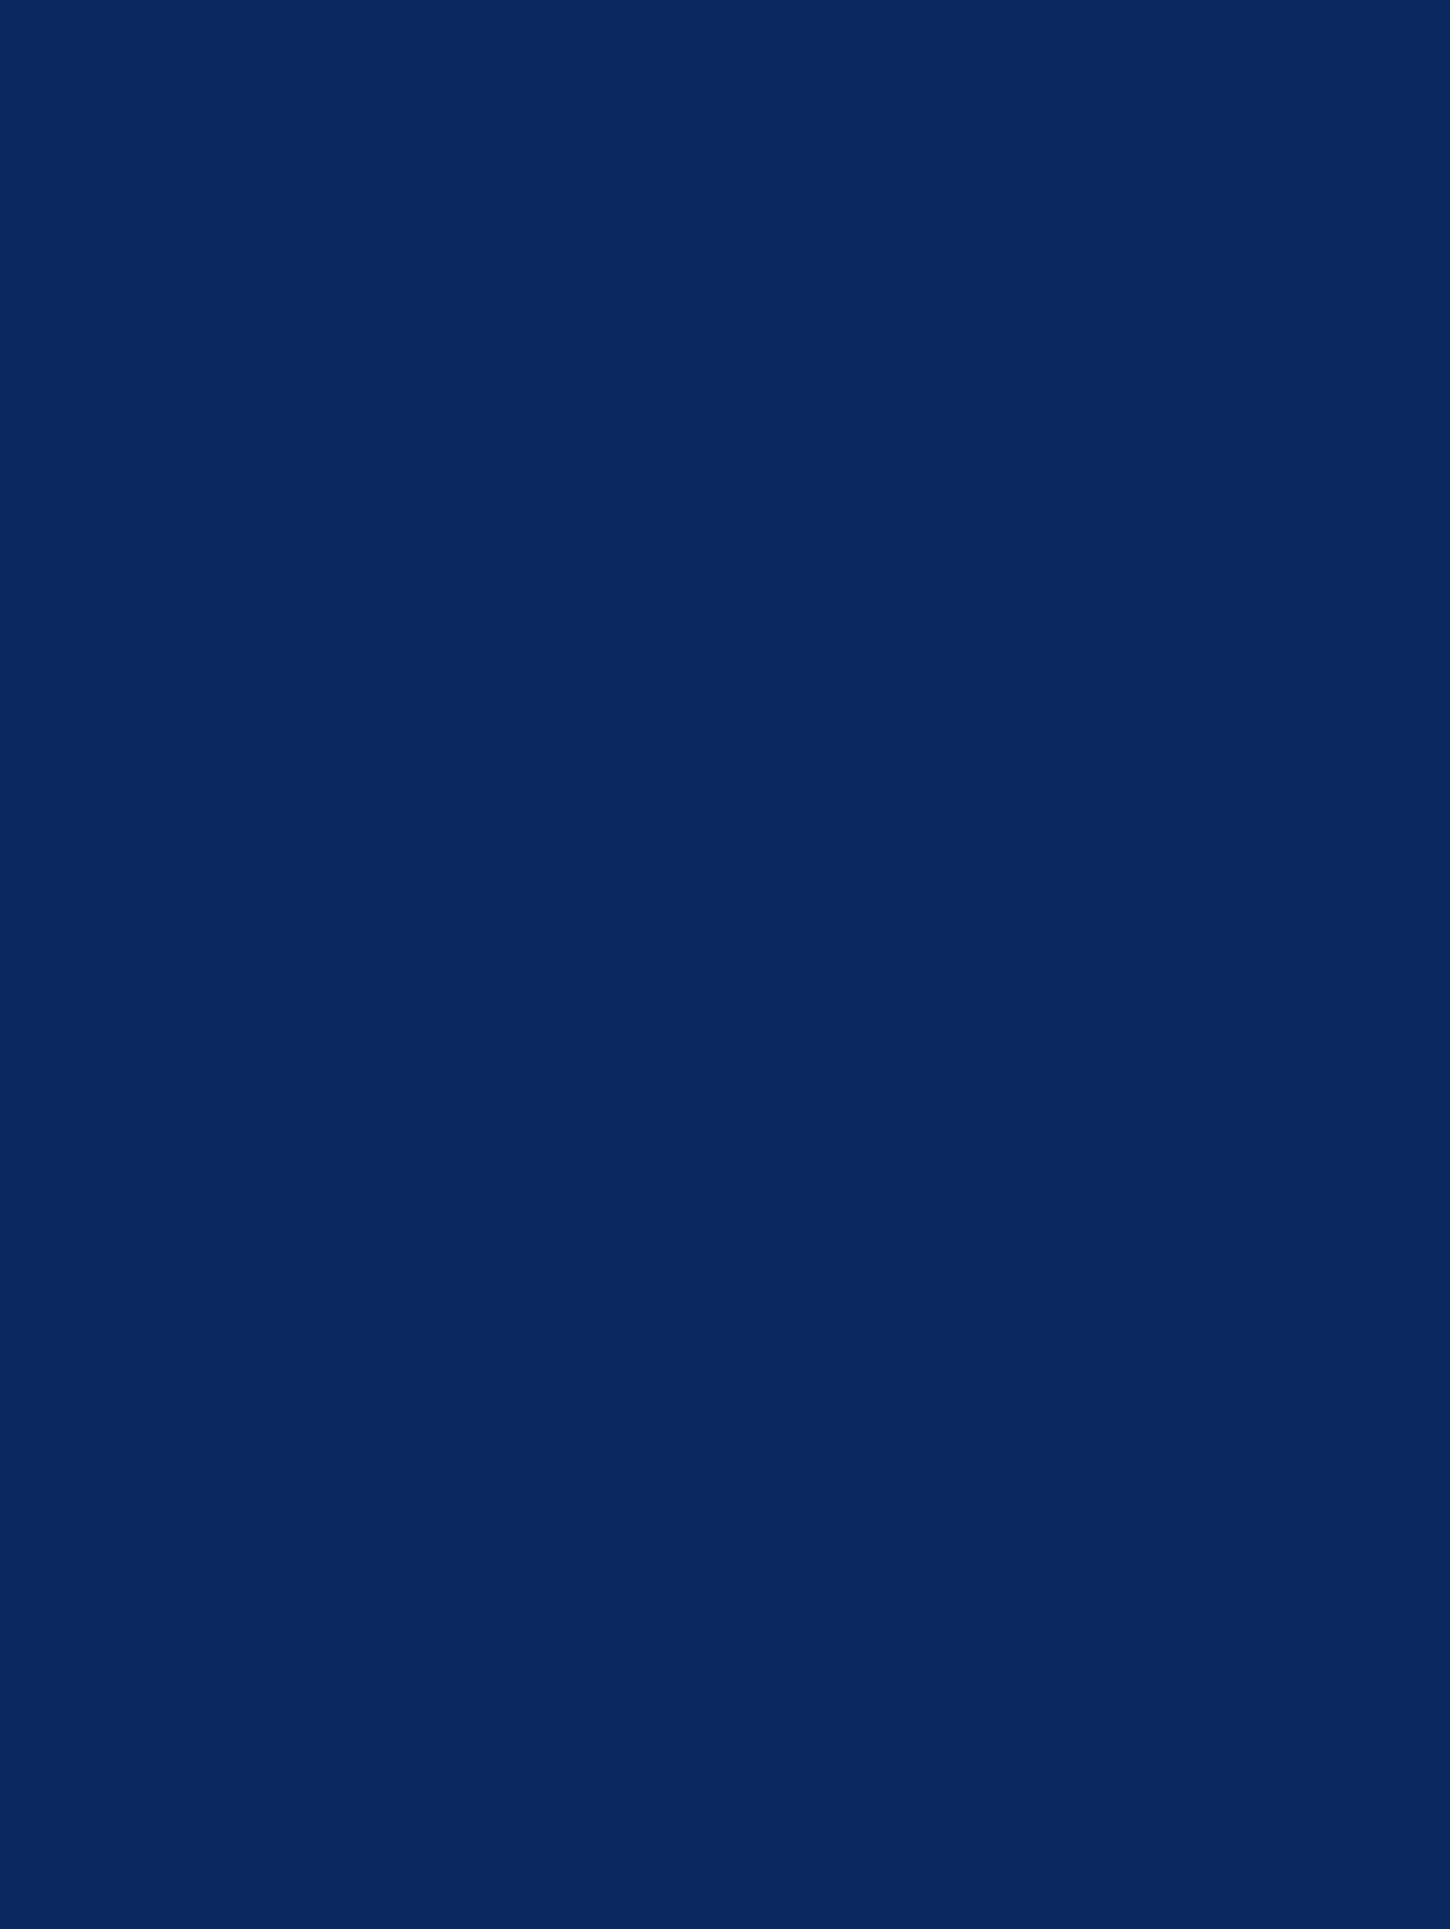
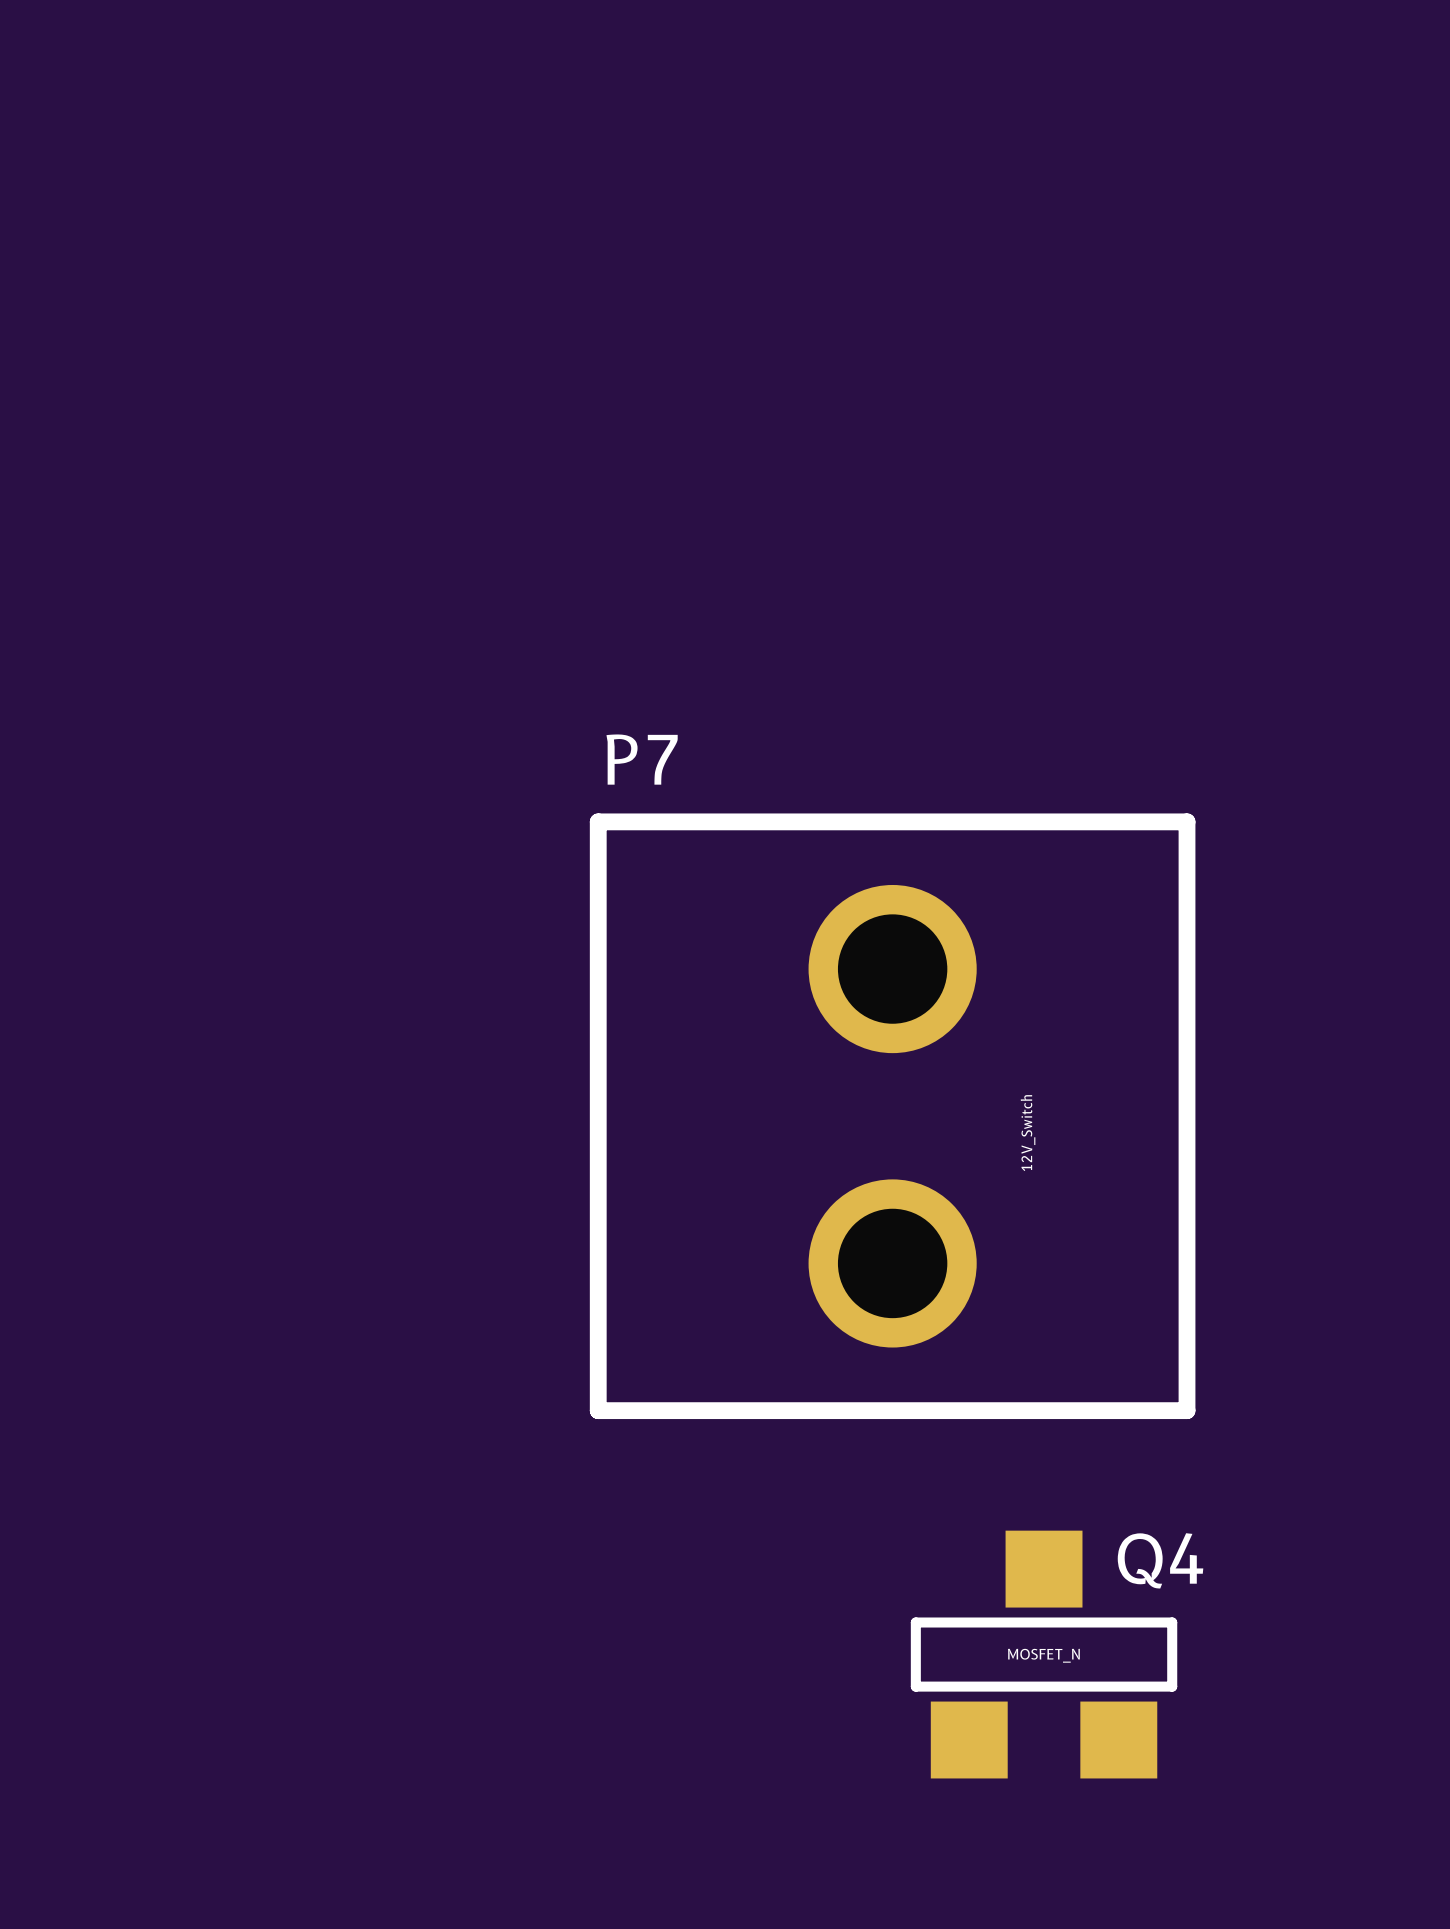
P7: none -> 12V_Switch (892, 1116)
Q4: none -> MOSFET_N (1044, 1654)

